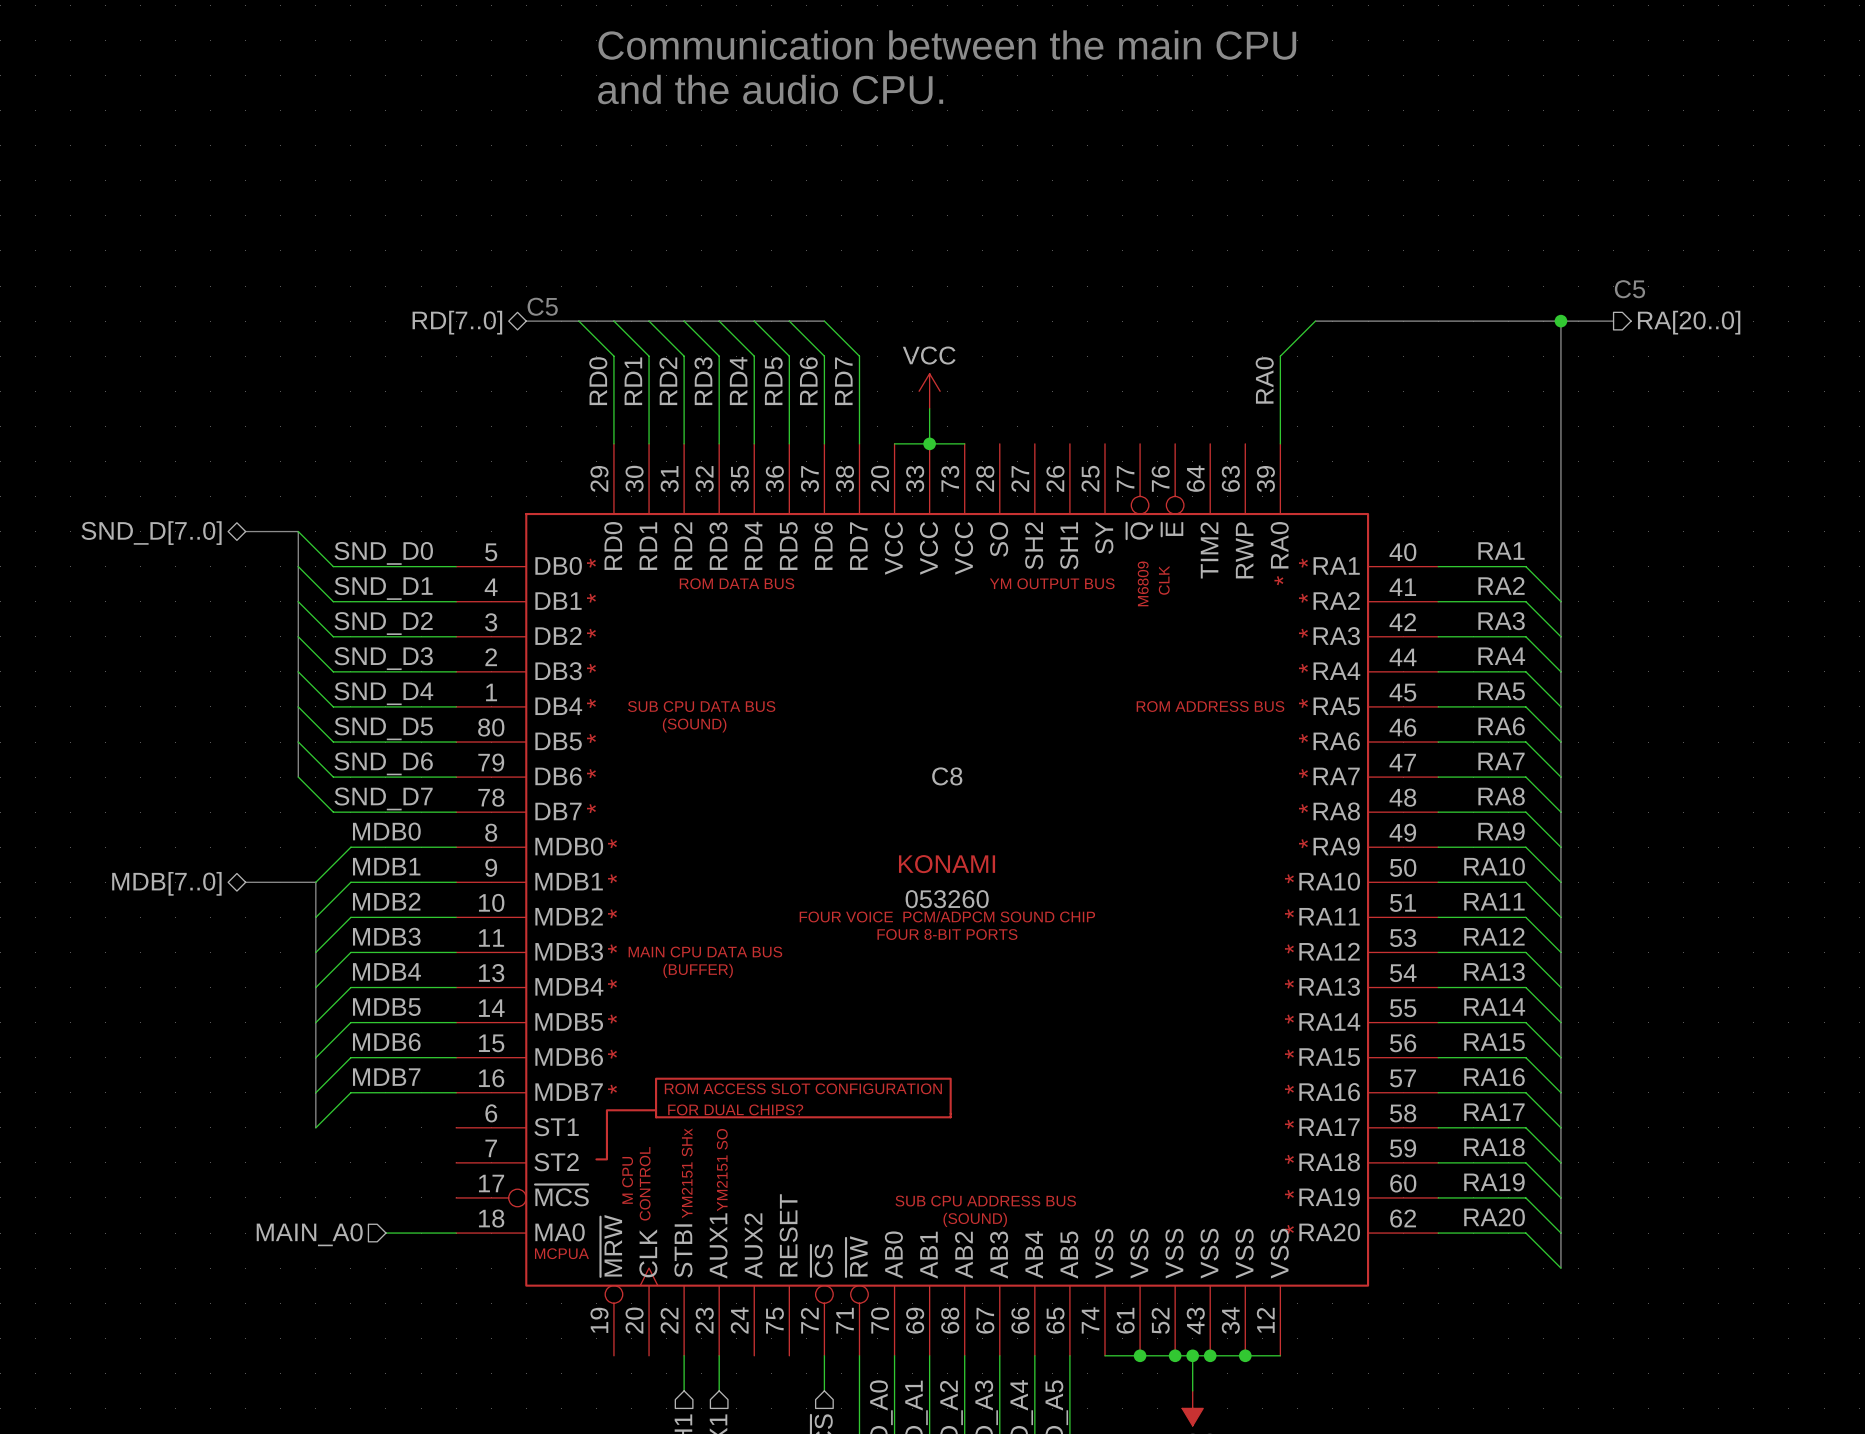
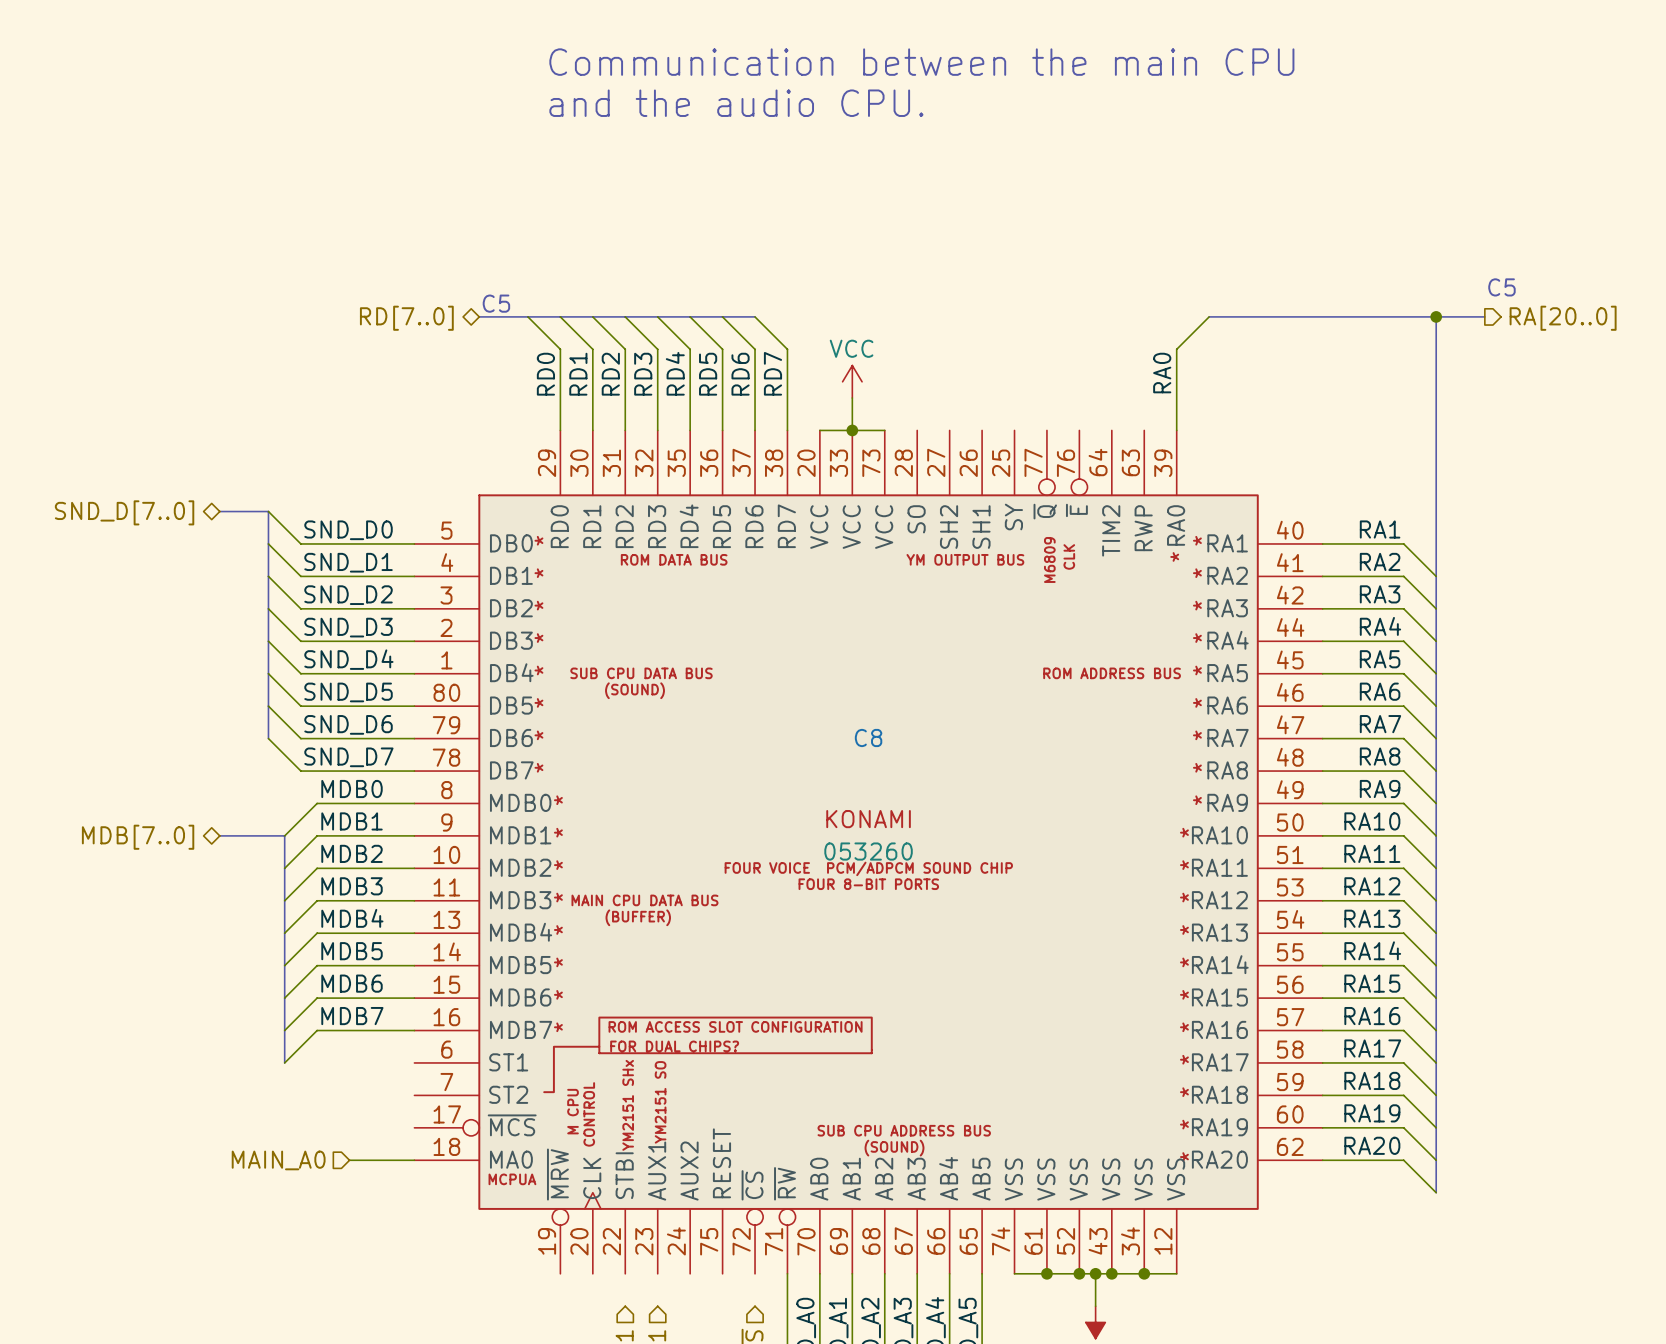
wire: (684, 1355) (684, 1390) -> none
wire: (719, 1355) (719, 1390) -> none
wire: (824, 1355) (824, 1390) -> none

